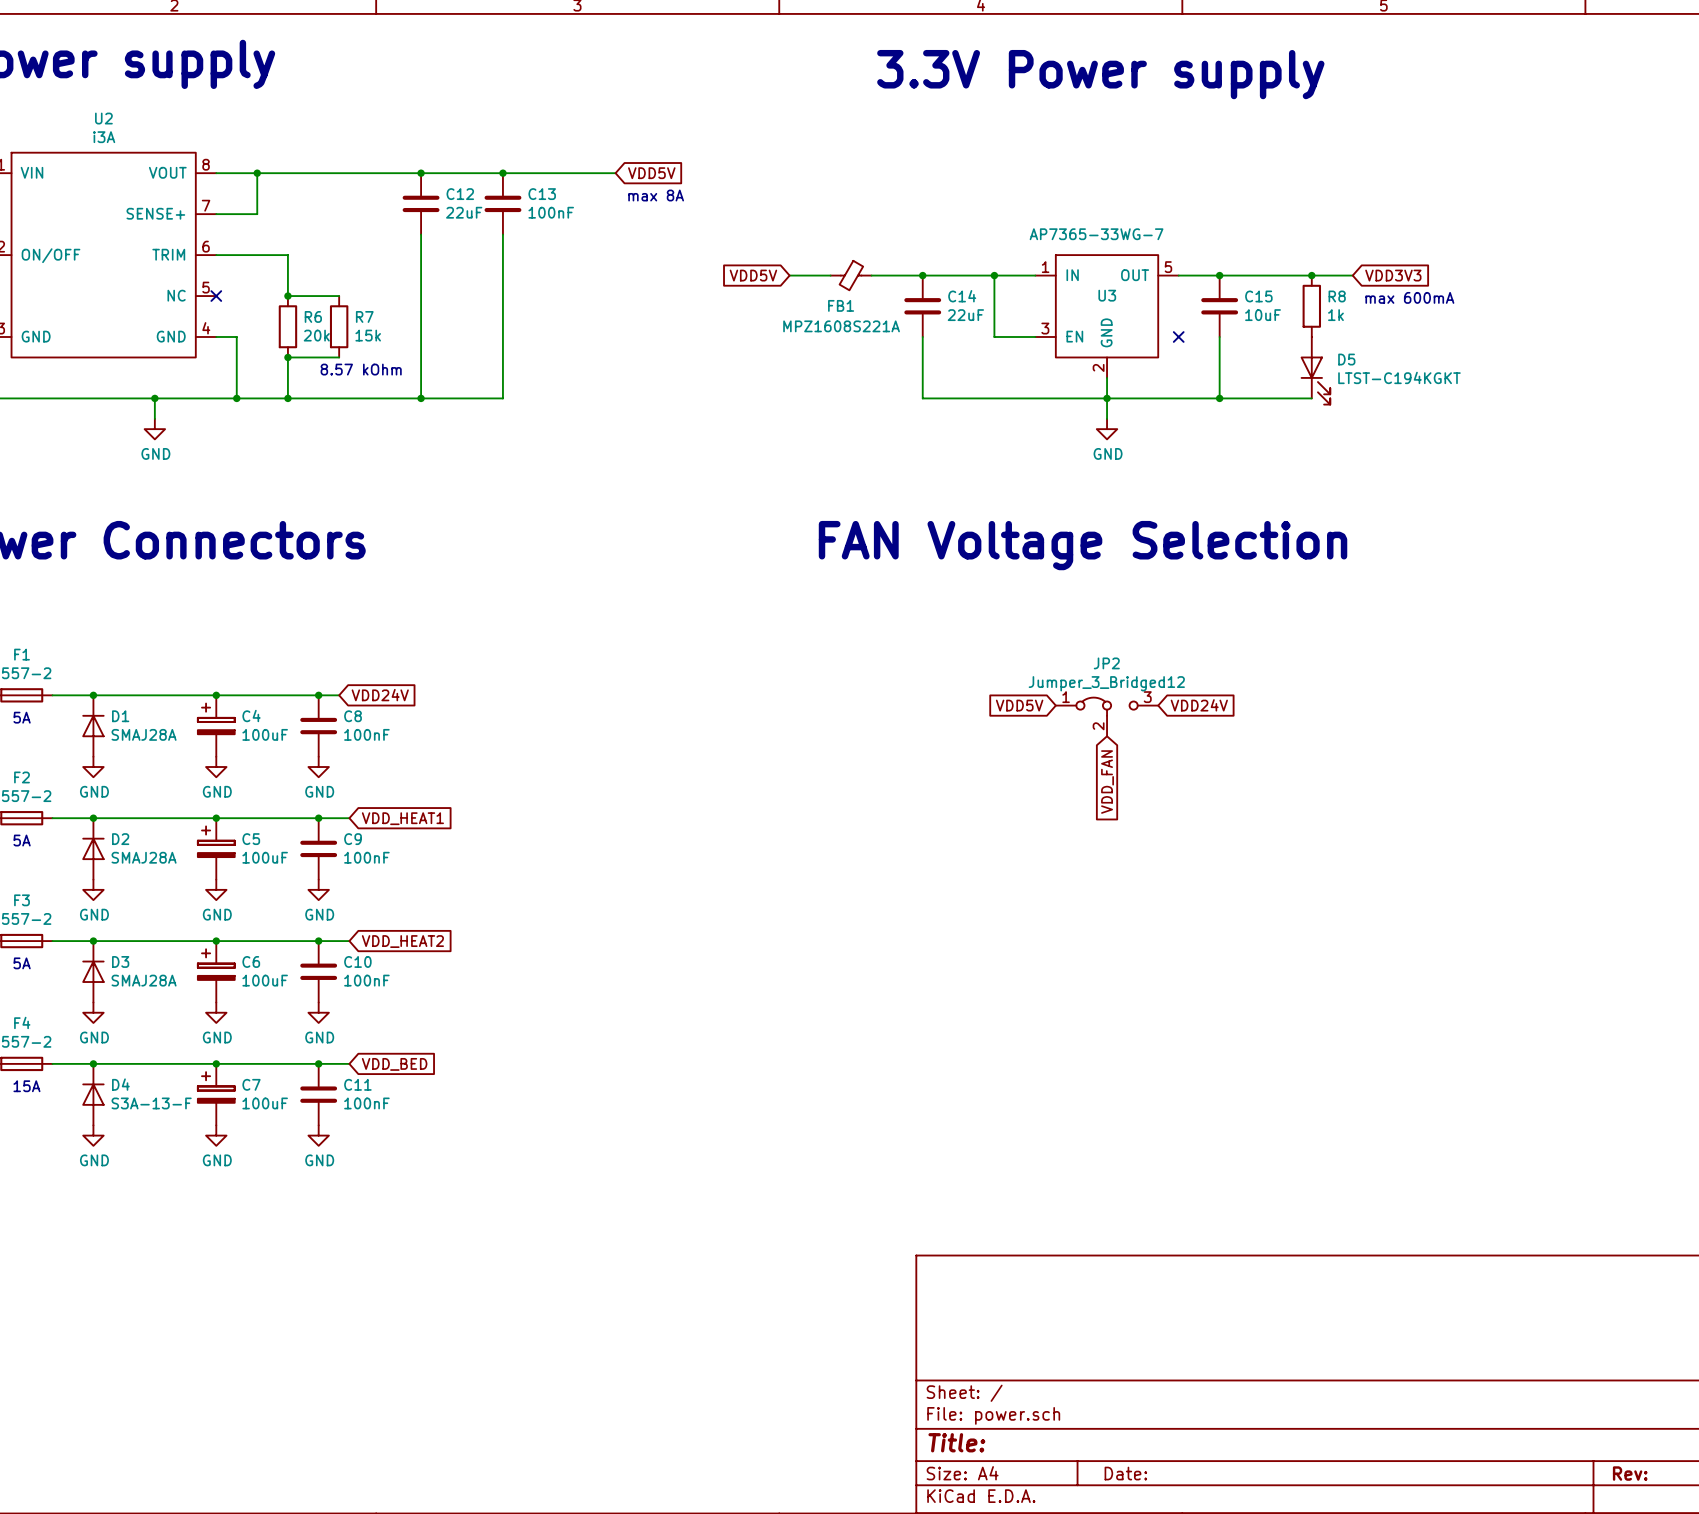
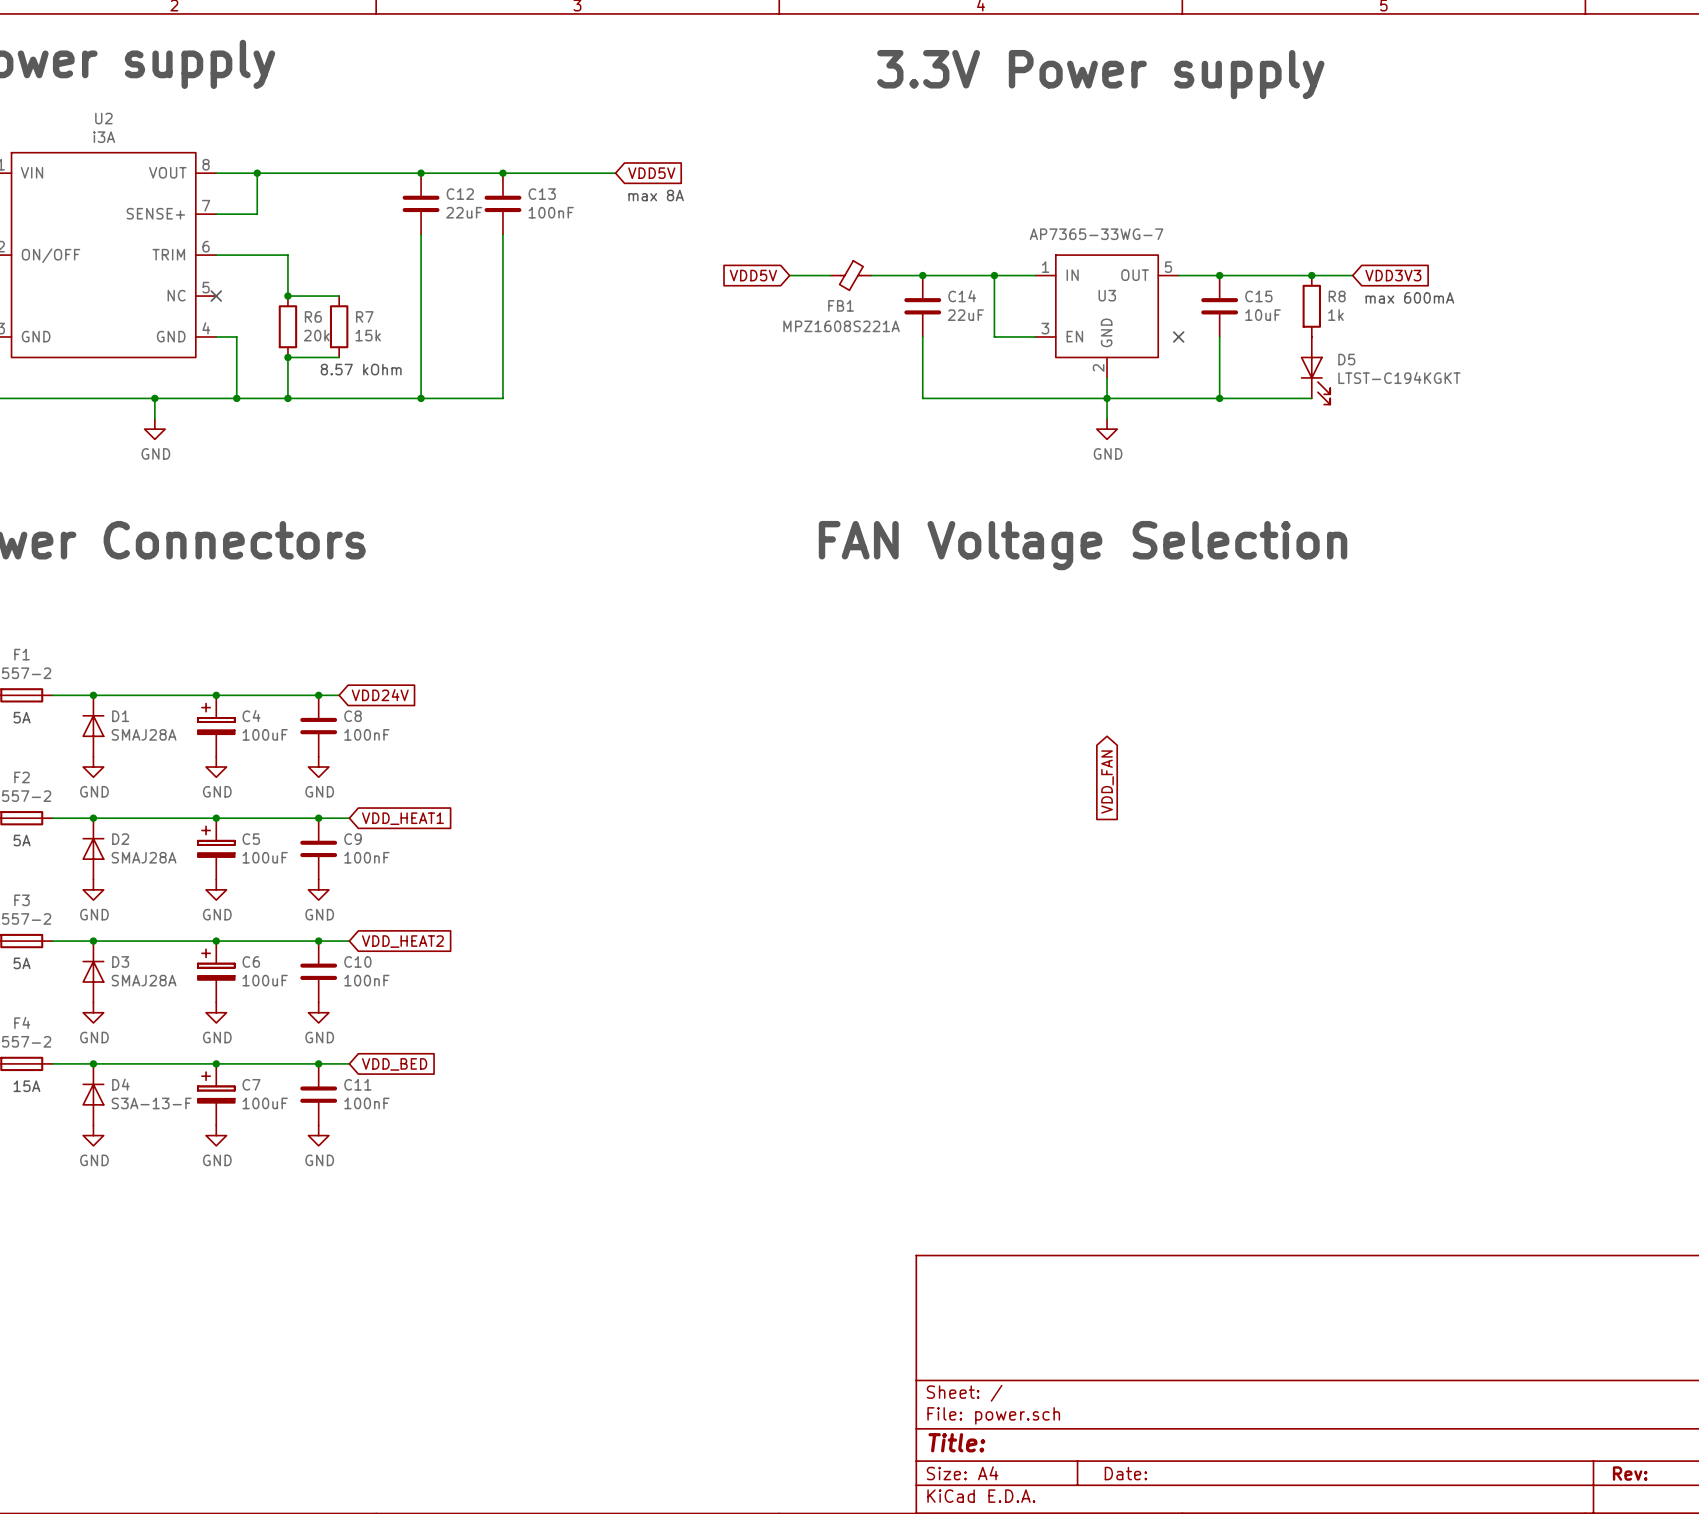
global label: VDD5V (1019, 705) -> none
global label: VDD24V (1199, 705) -> none
JP2: Jumper_3_Bridged12 (1107, 716) -> none

